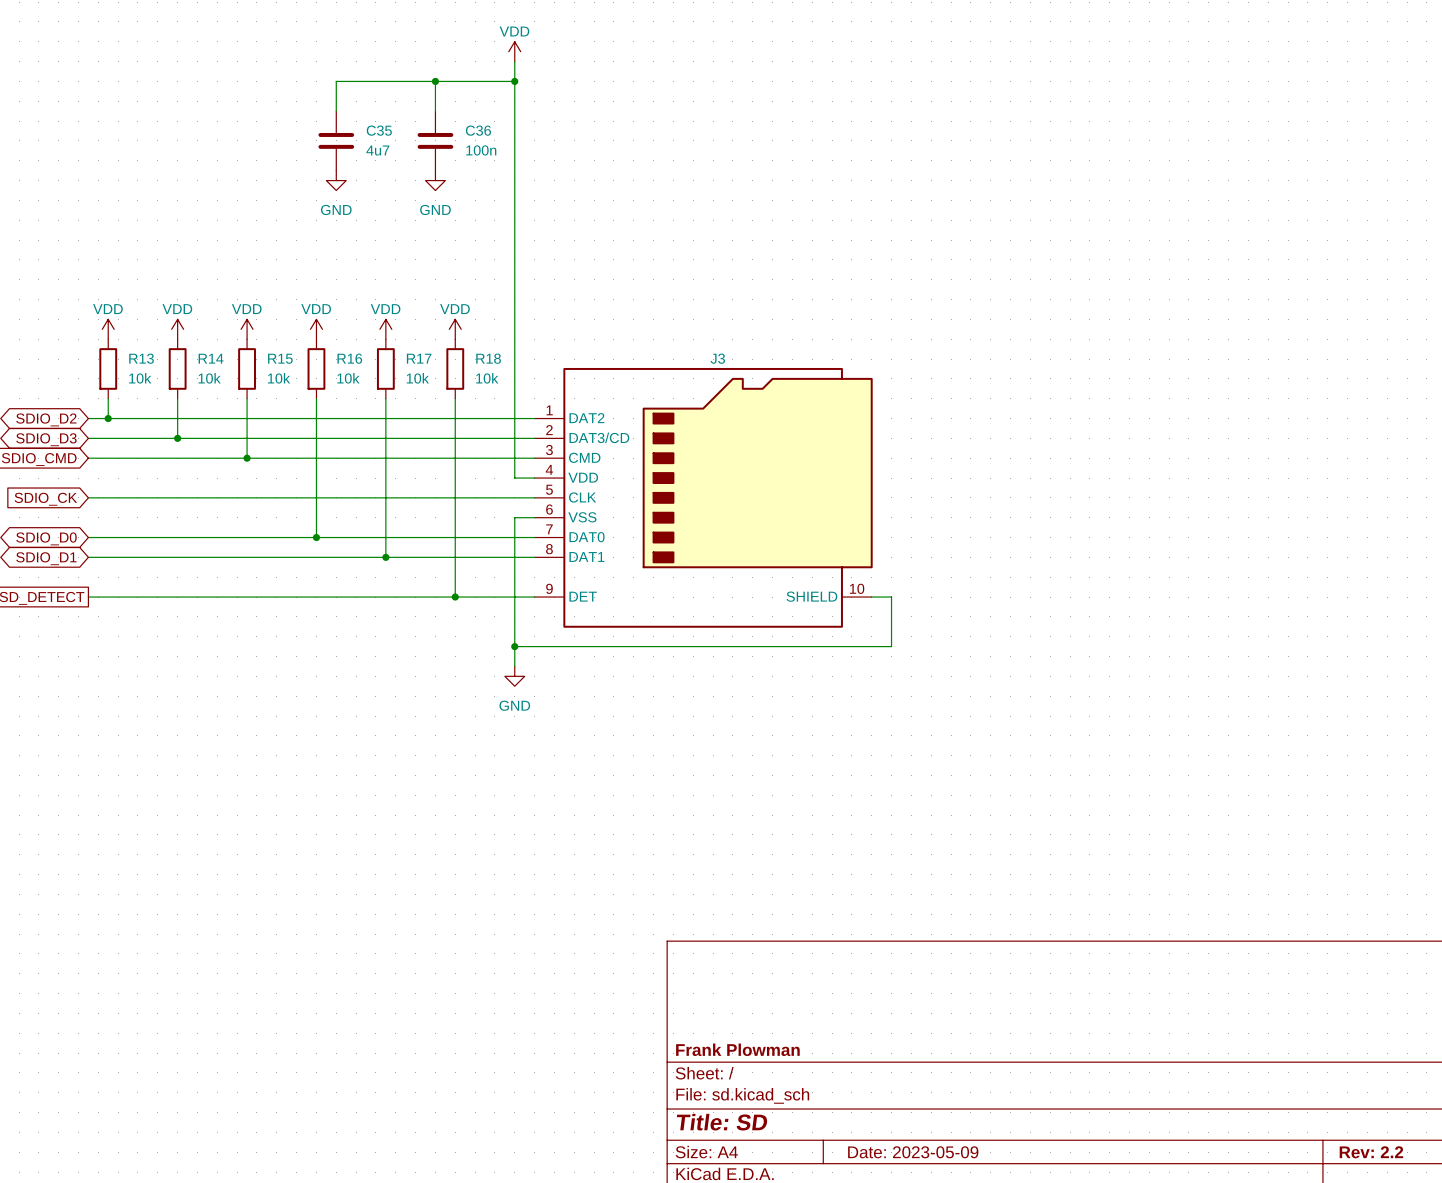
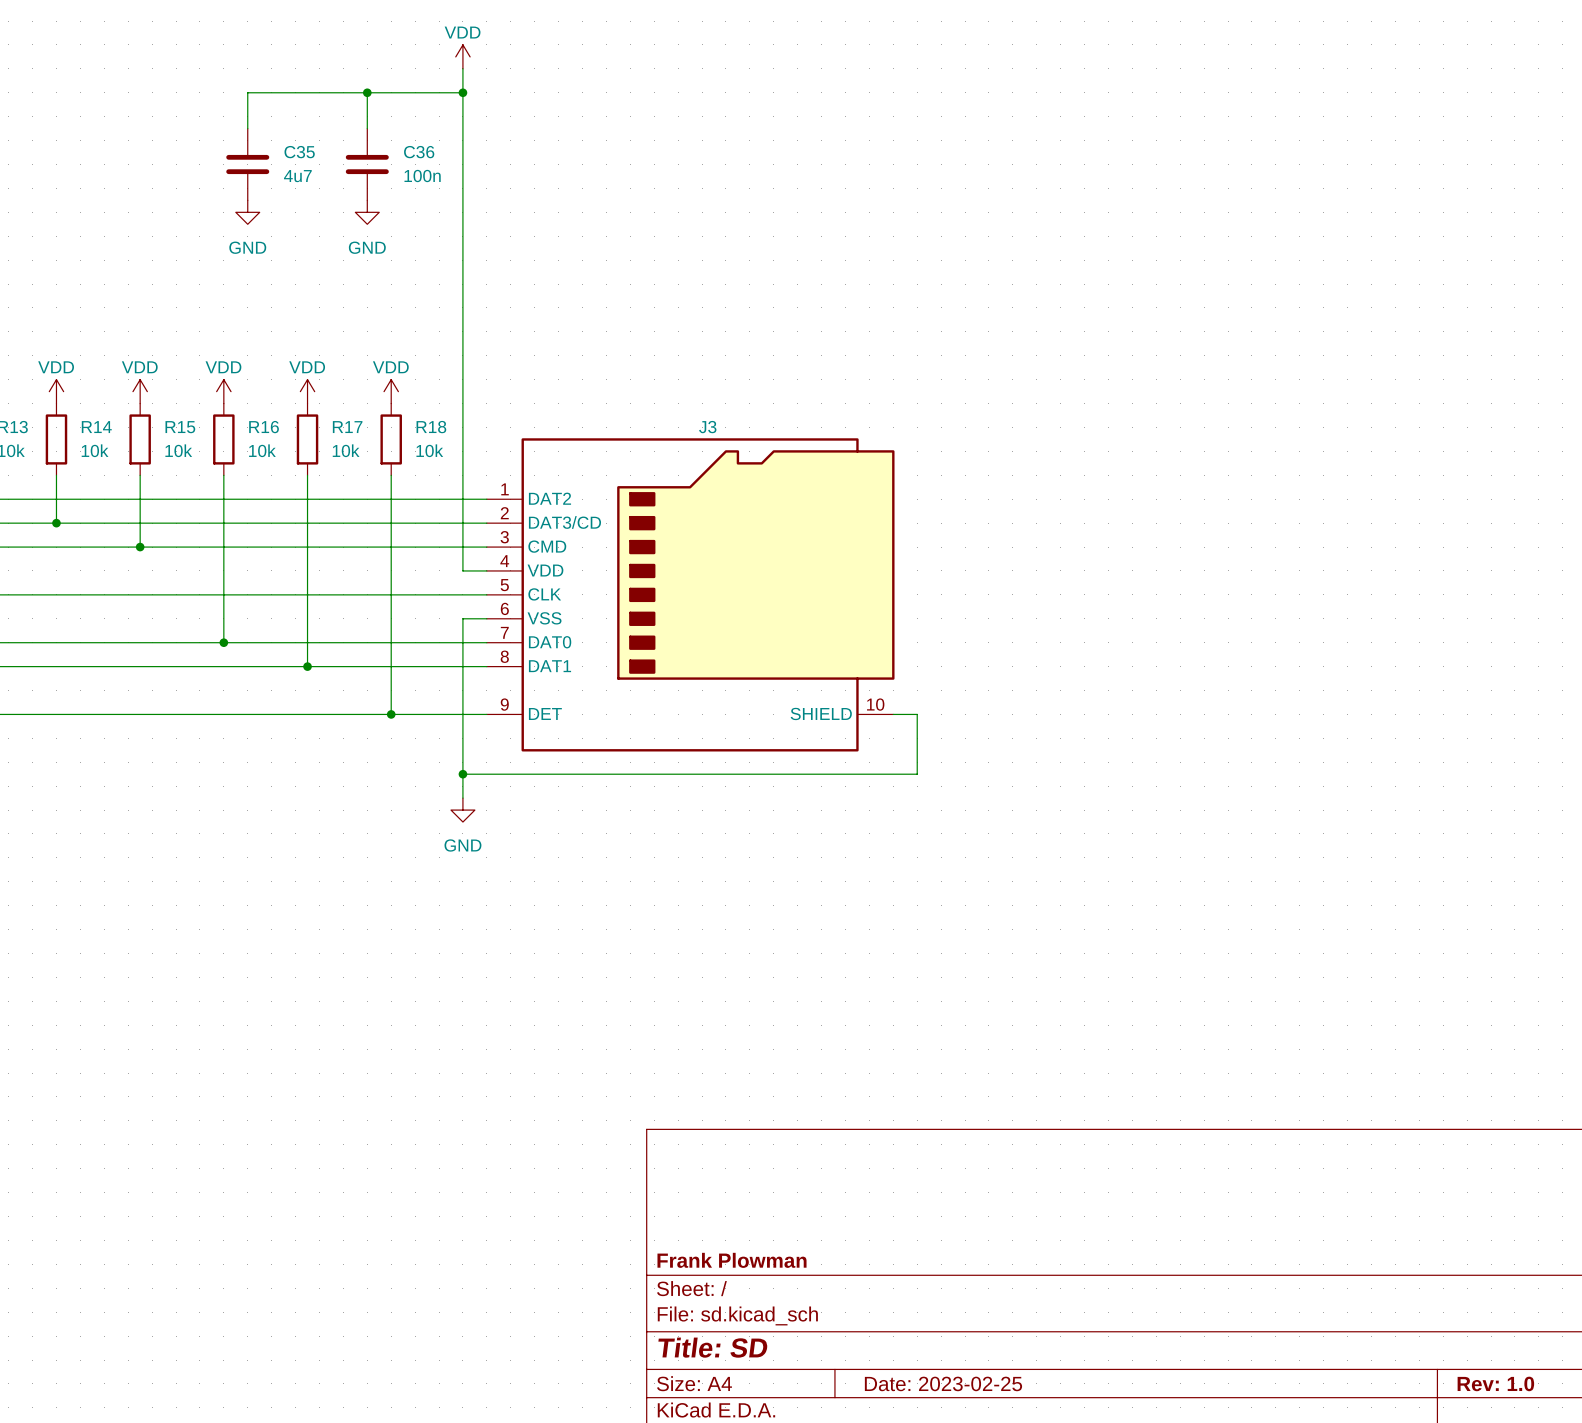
title block: Date: 2023-05-09 (913, 1152) -> Date: 2023-02-25 (943, 1383)
title block: Rev: 2.2 (1371, 1152) -> Rev: 1.0 (1495, 1383)

